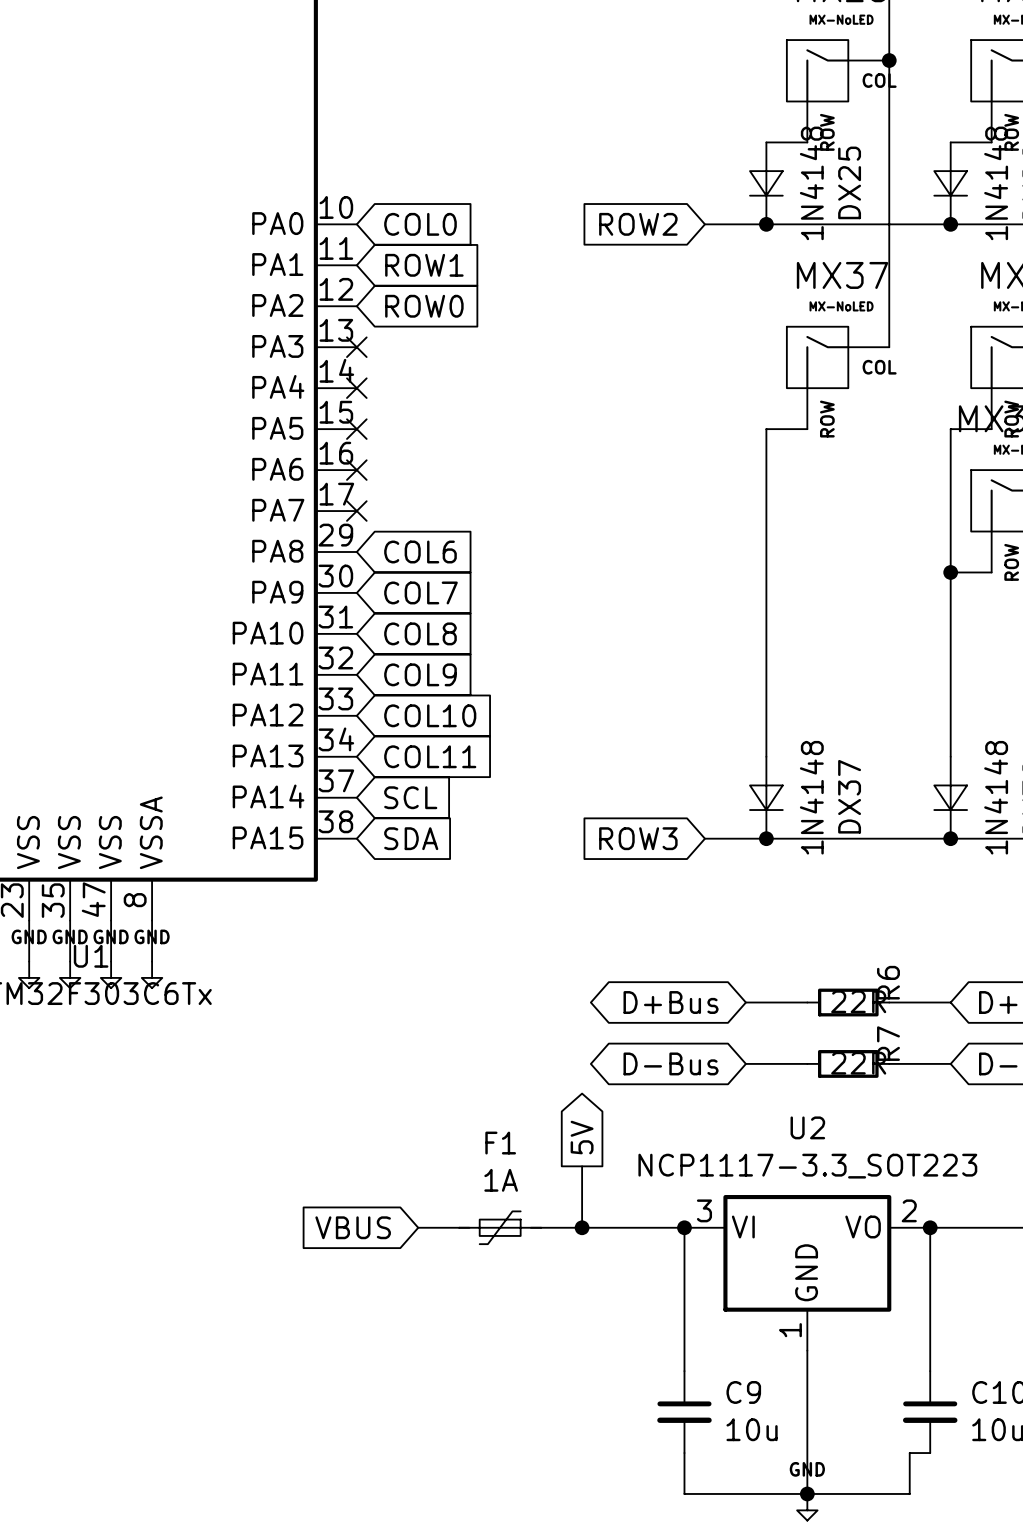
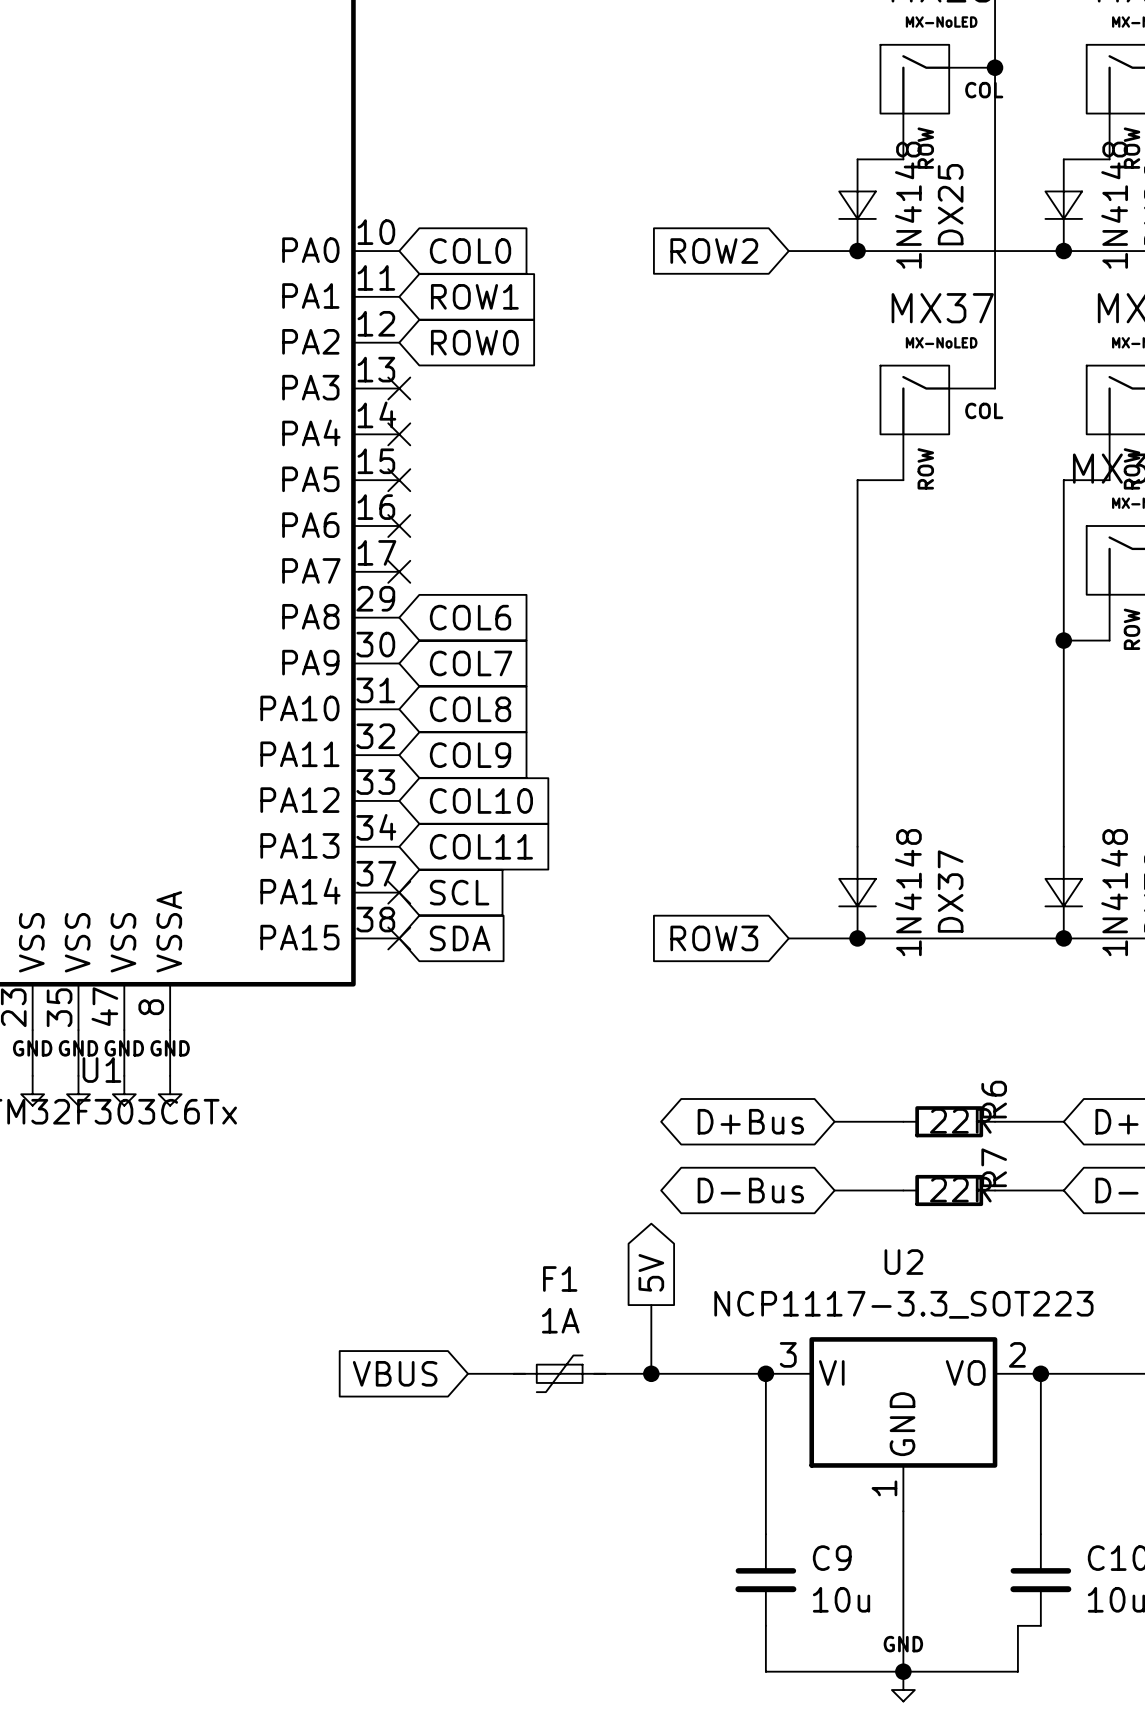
no-connect mark: none -> (399, 892)
no-connect mark: none -> (399, 938)

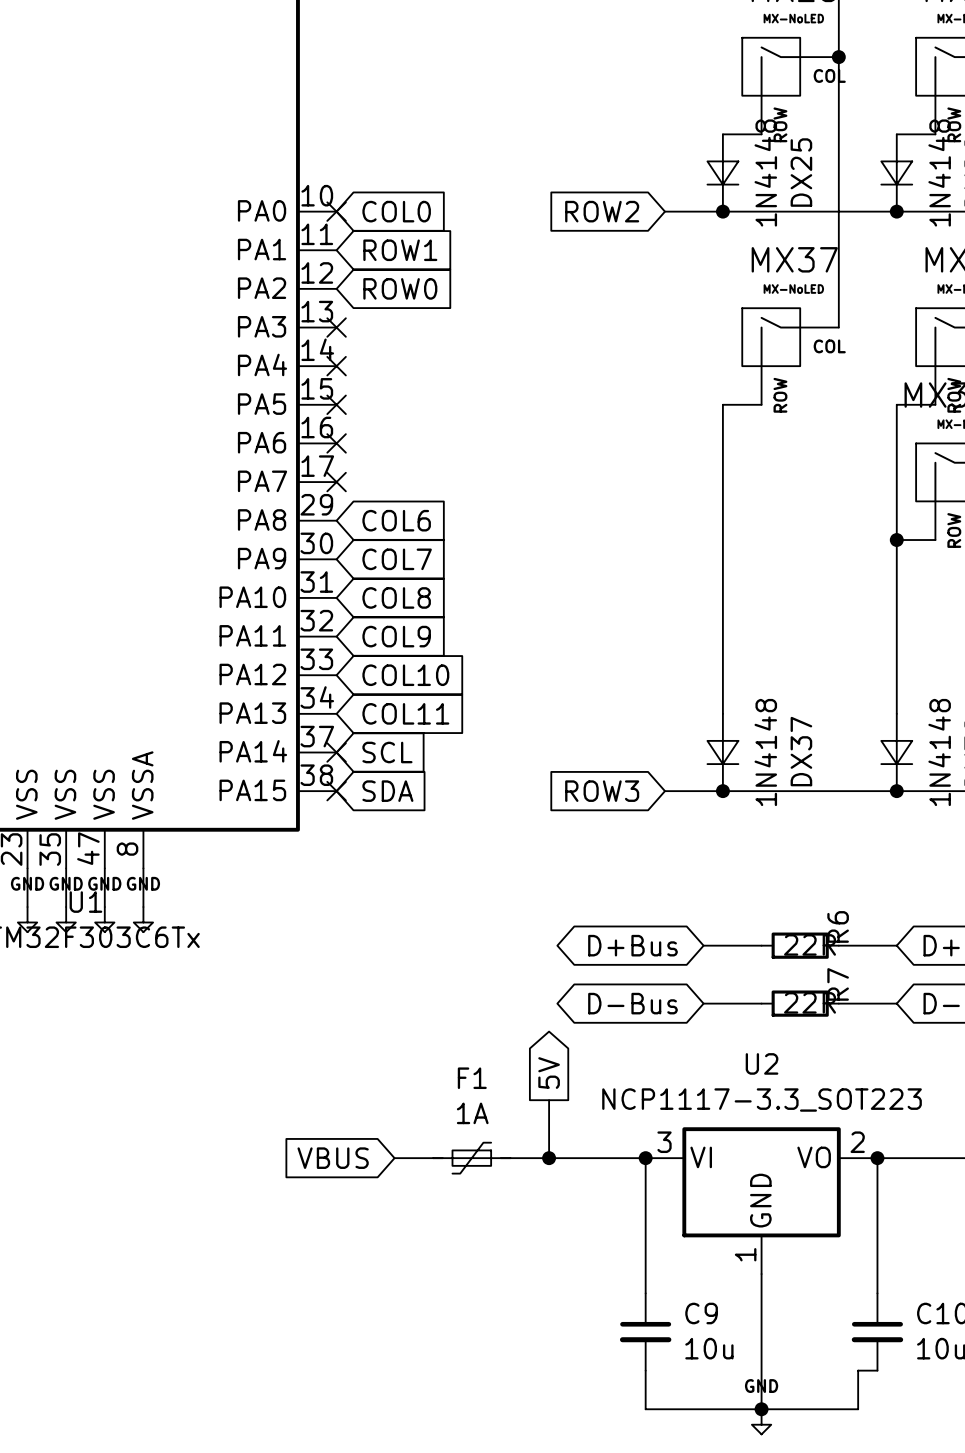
no-connect mark: none -> (336, 211)

